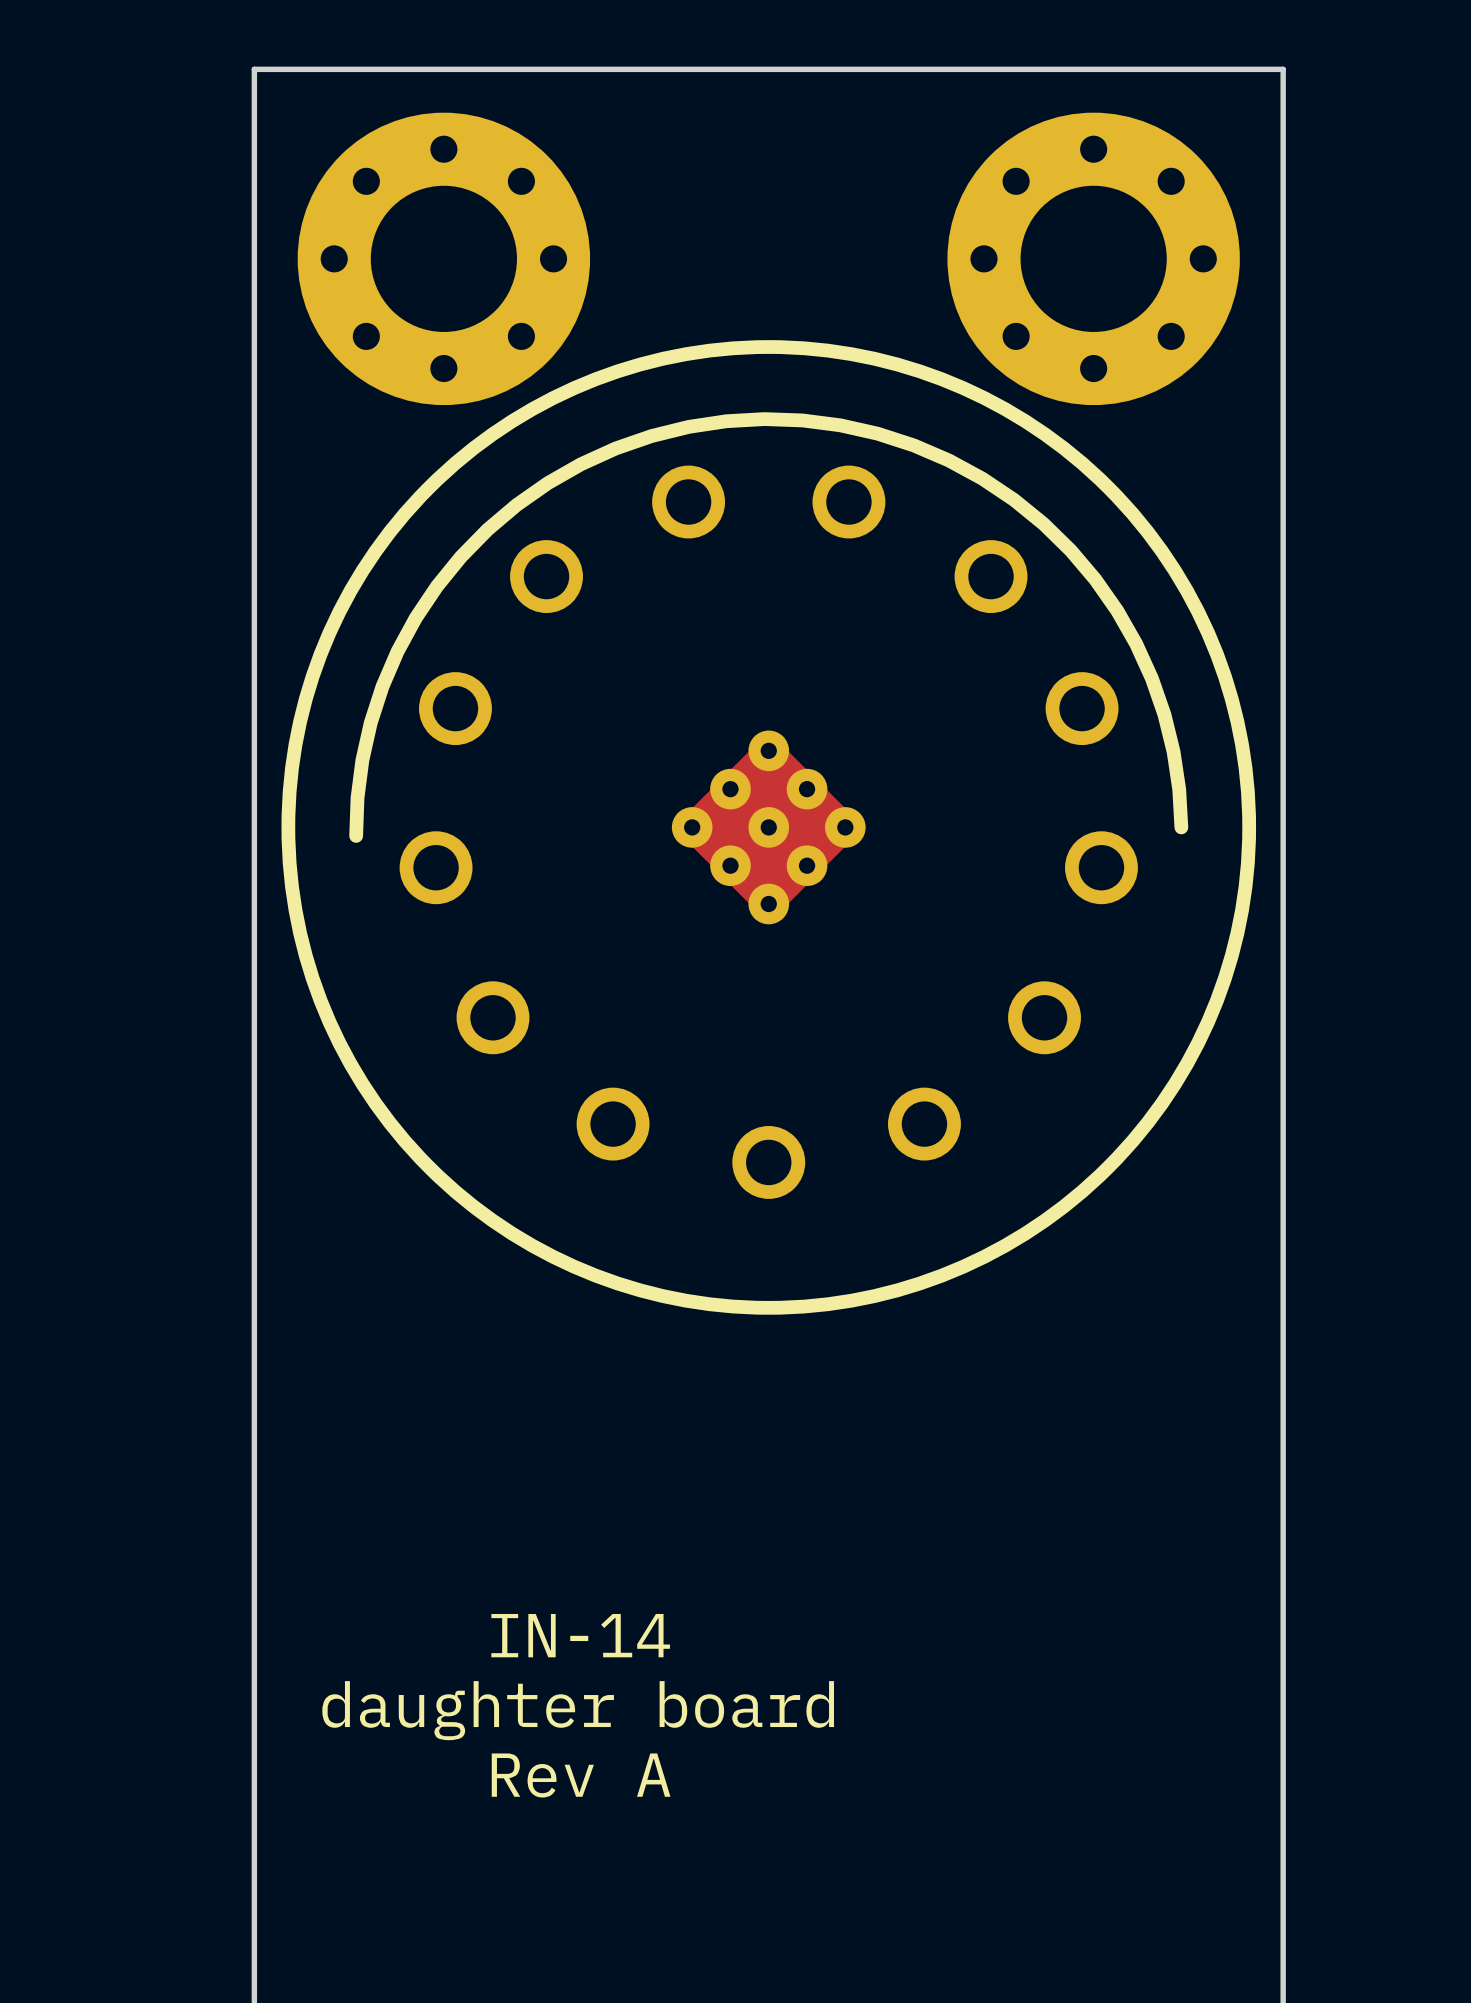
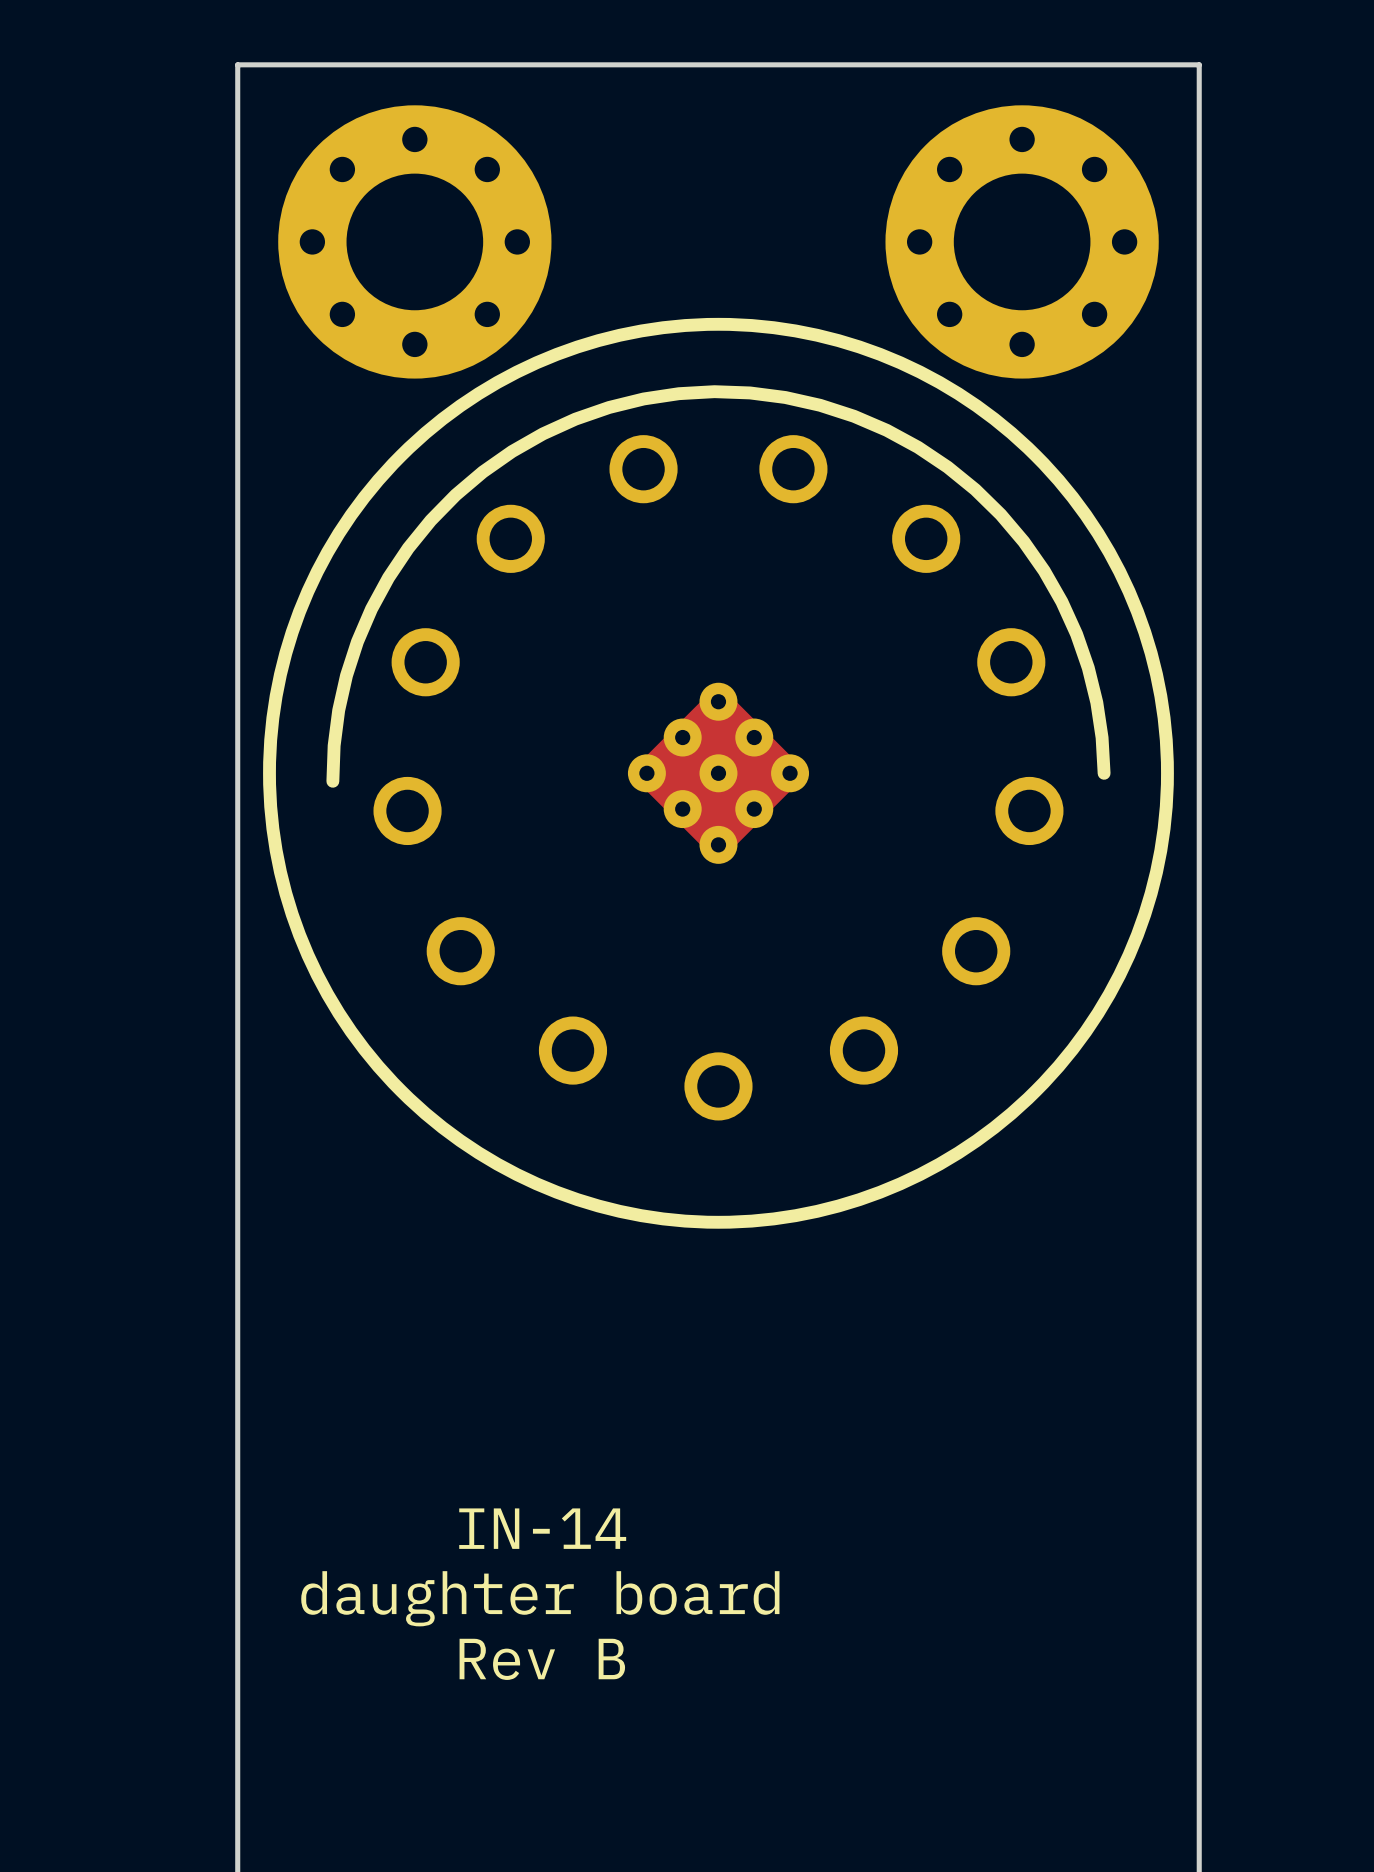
text: Rev A (581, 1775) -> Rev B (542, 1659)

